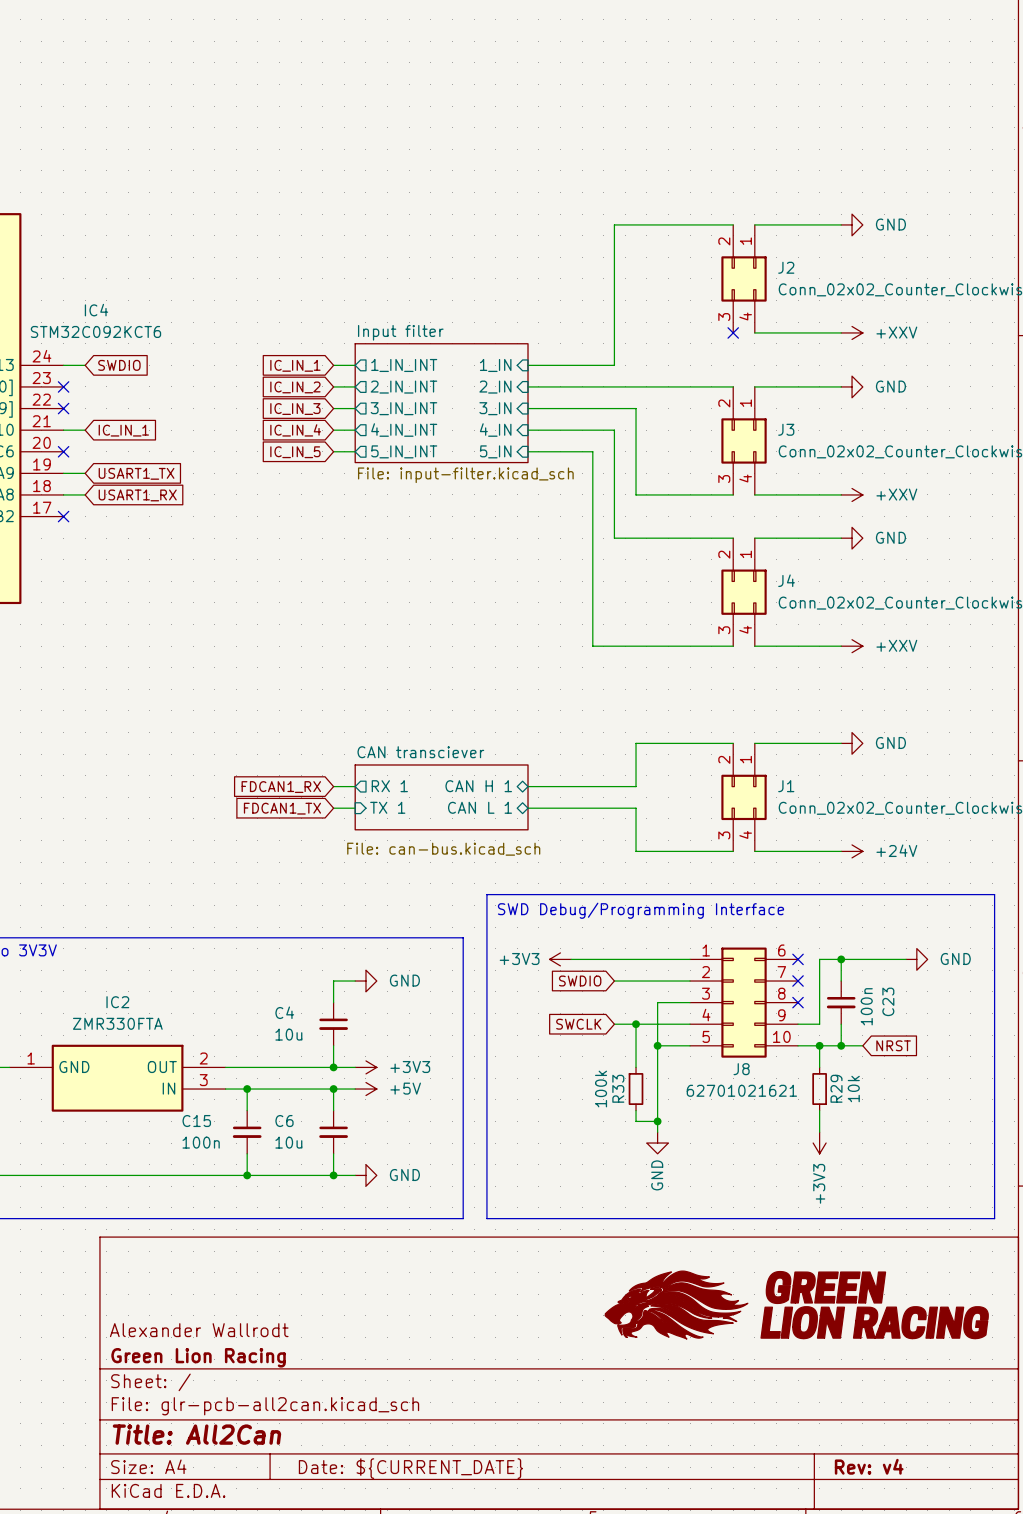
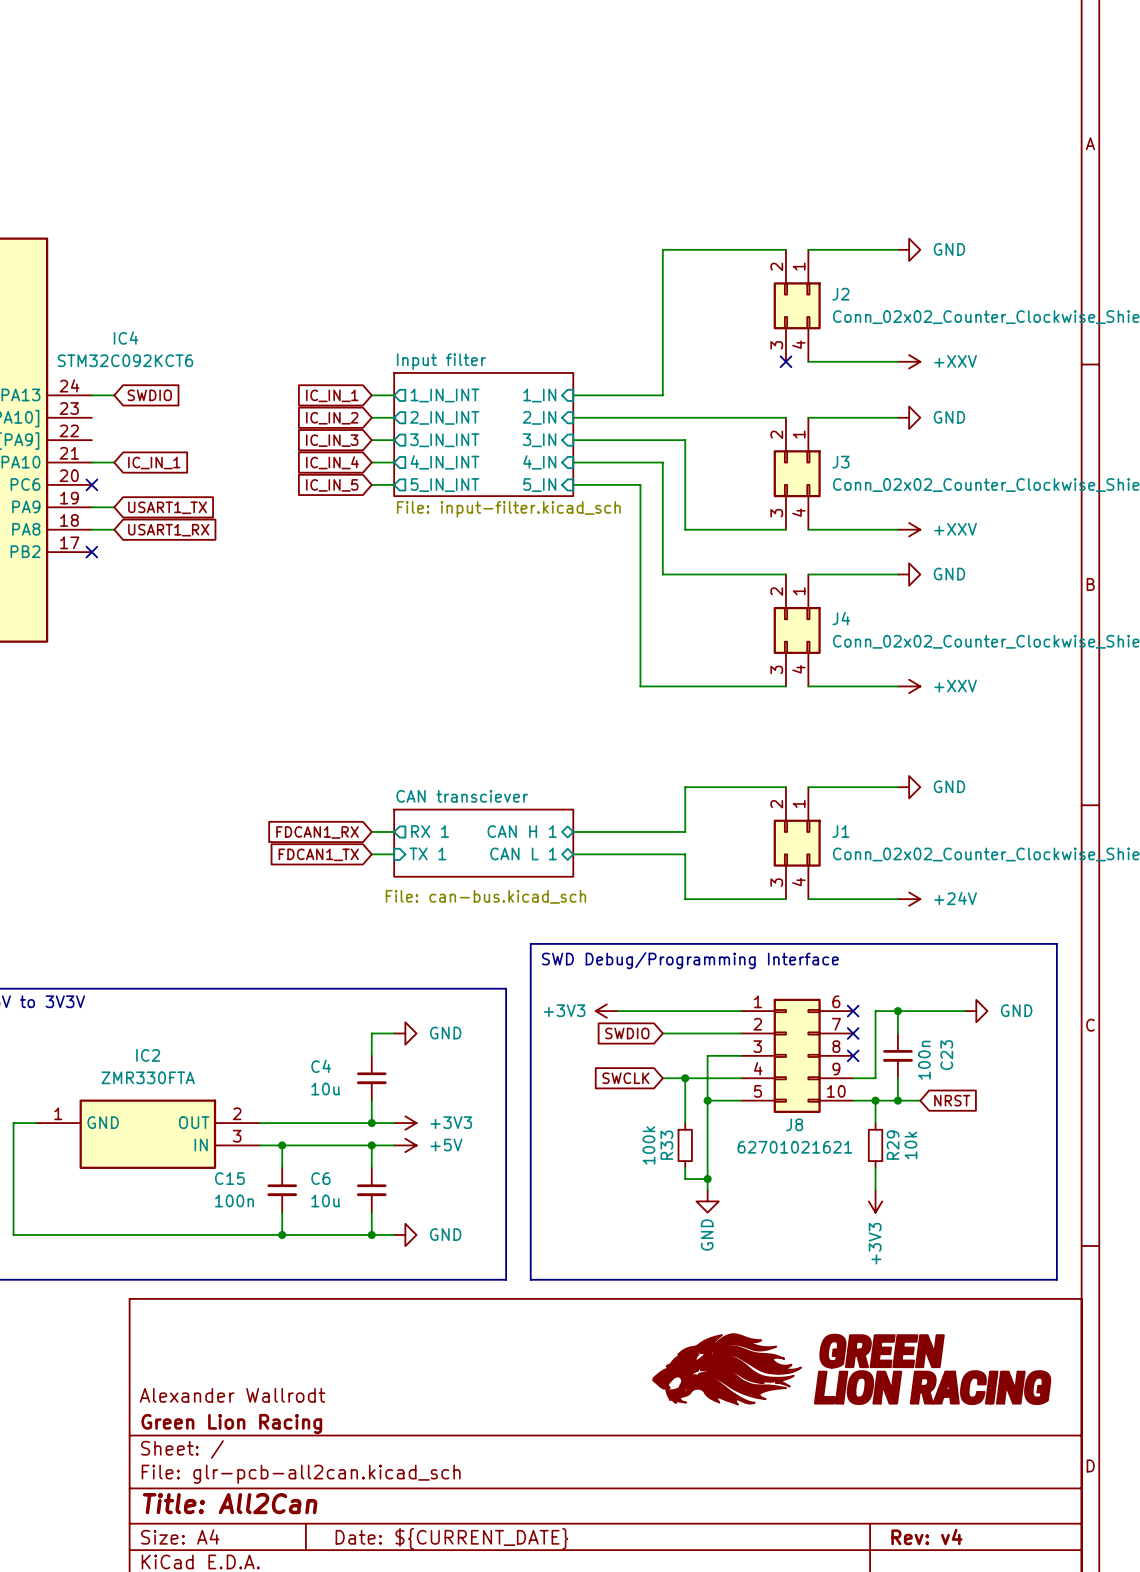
no-connect mark: (63, 386) -> none
no-connect mark: (63, 408) -> none

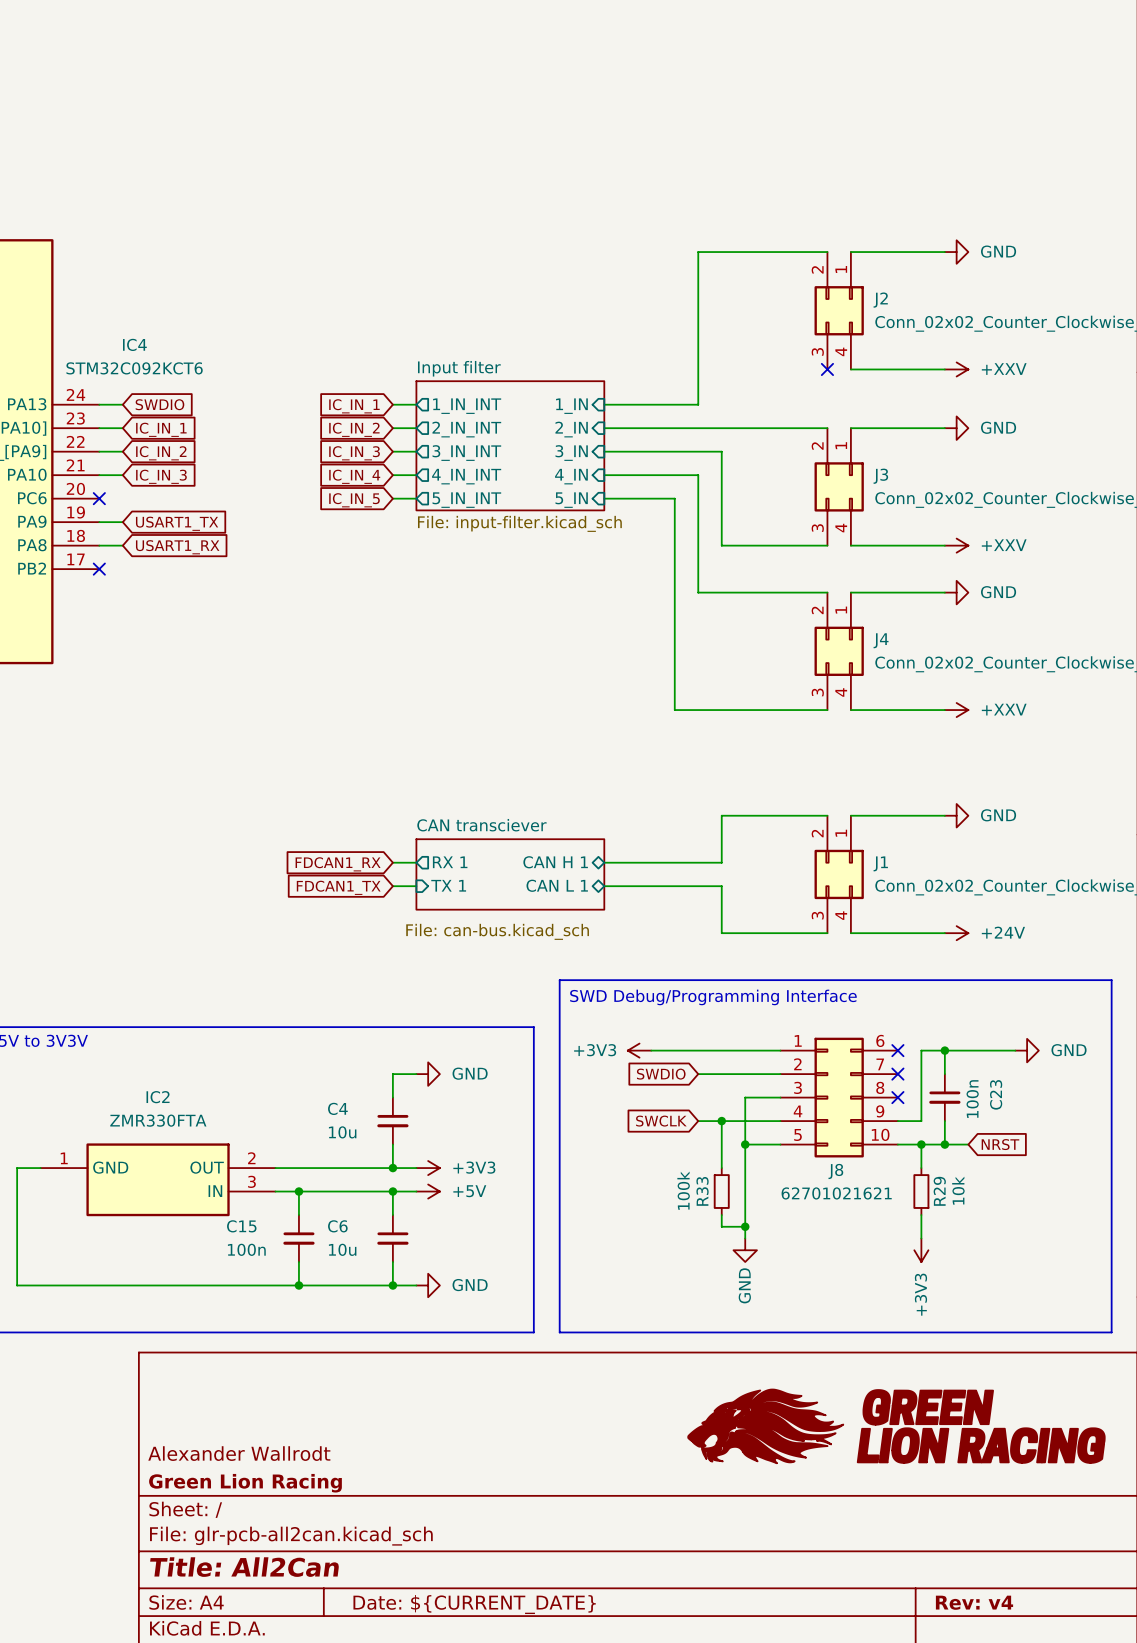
wire: none -> (99, 428) (122, 428)
global label: none -> IC_IN_1 (161, 429)
wire: none -> (99, 451) (122, 451)
global label: none -> IC_IN_2 (161, 453)
global label: IC_IN_1 (154, 463) -> IC_IN_3 (161, 476)

